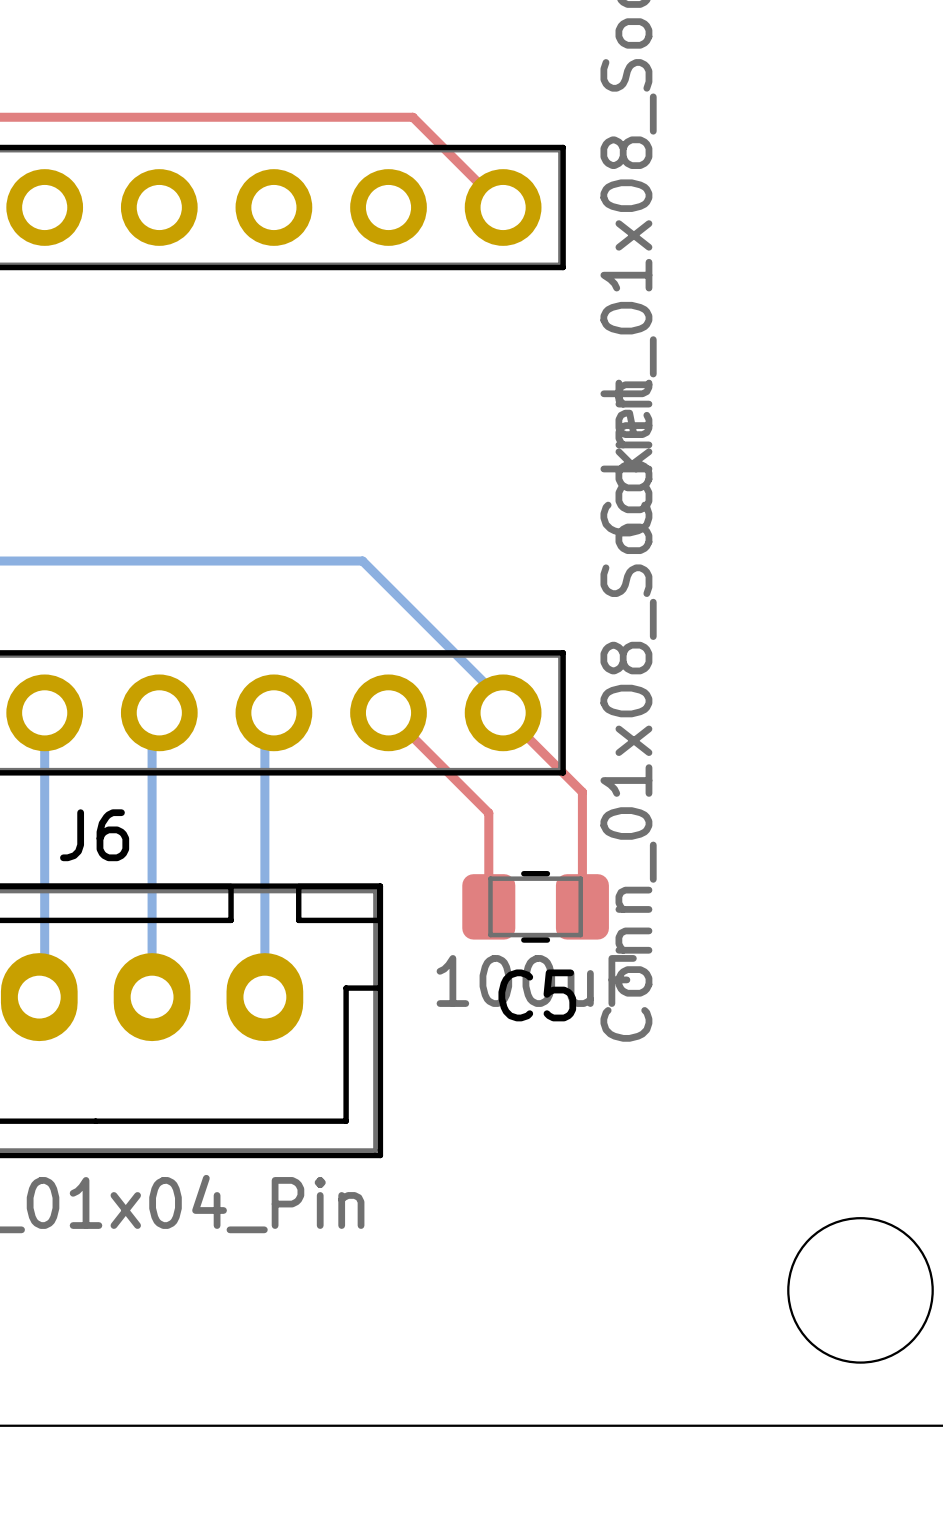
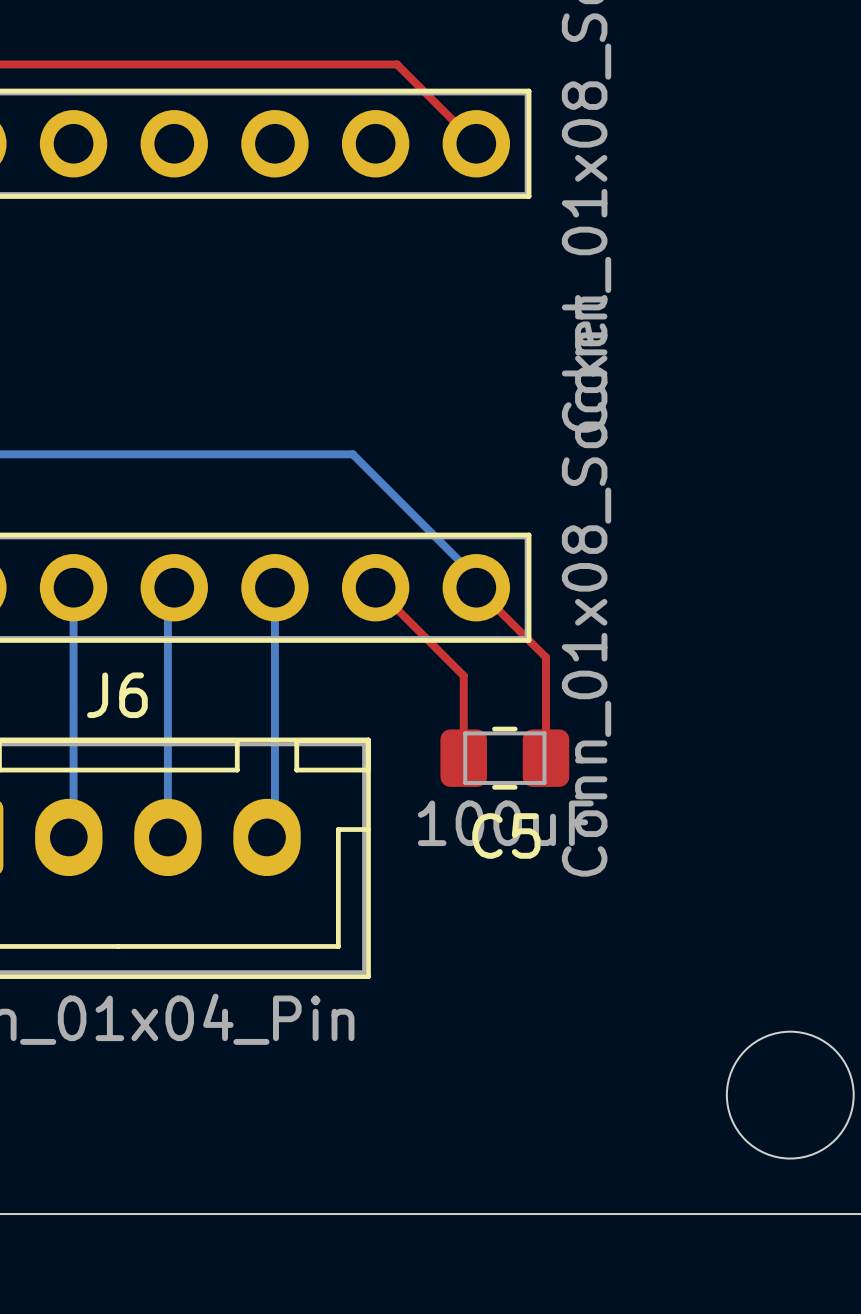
bottom track: none -> (274, 577) (274, 829)
bottom track: (273, 712) (264, 721) (264, 997) -> none

